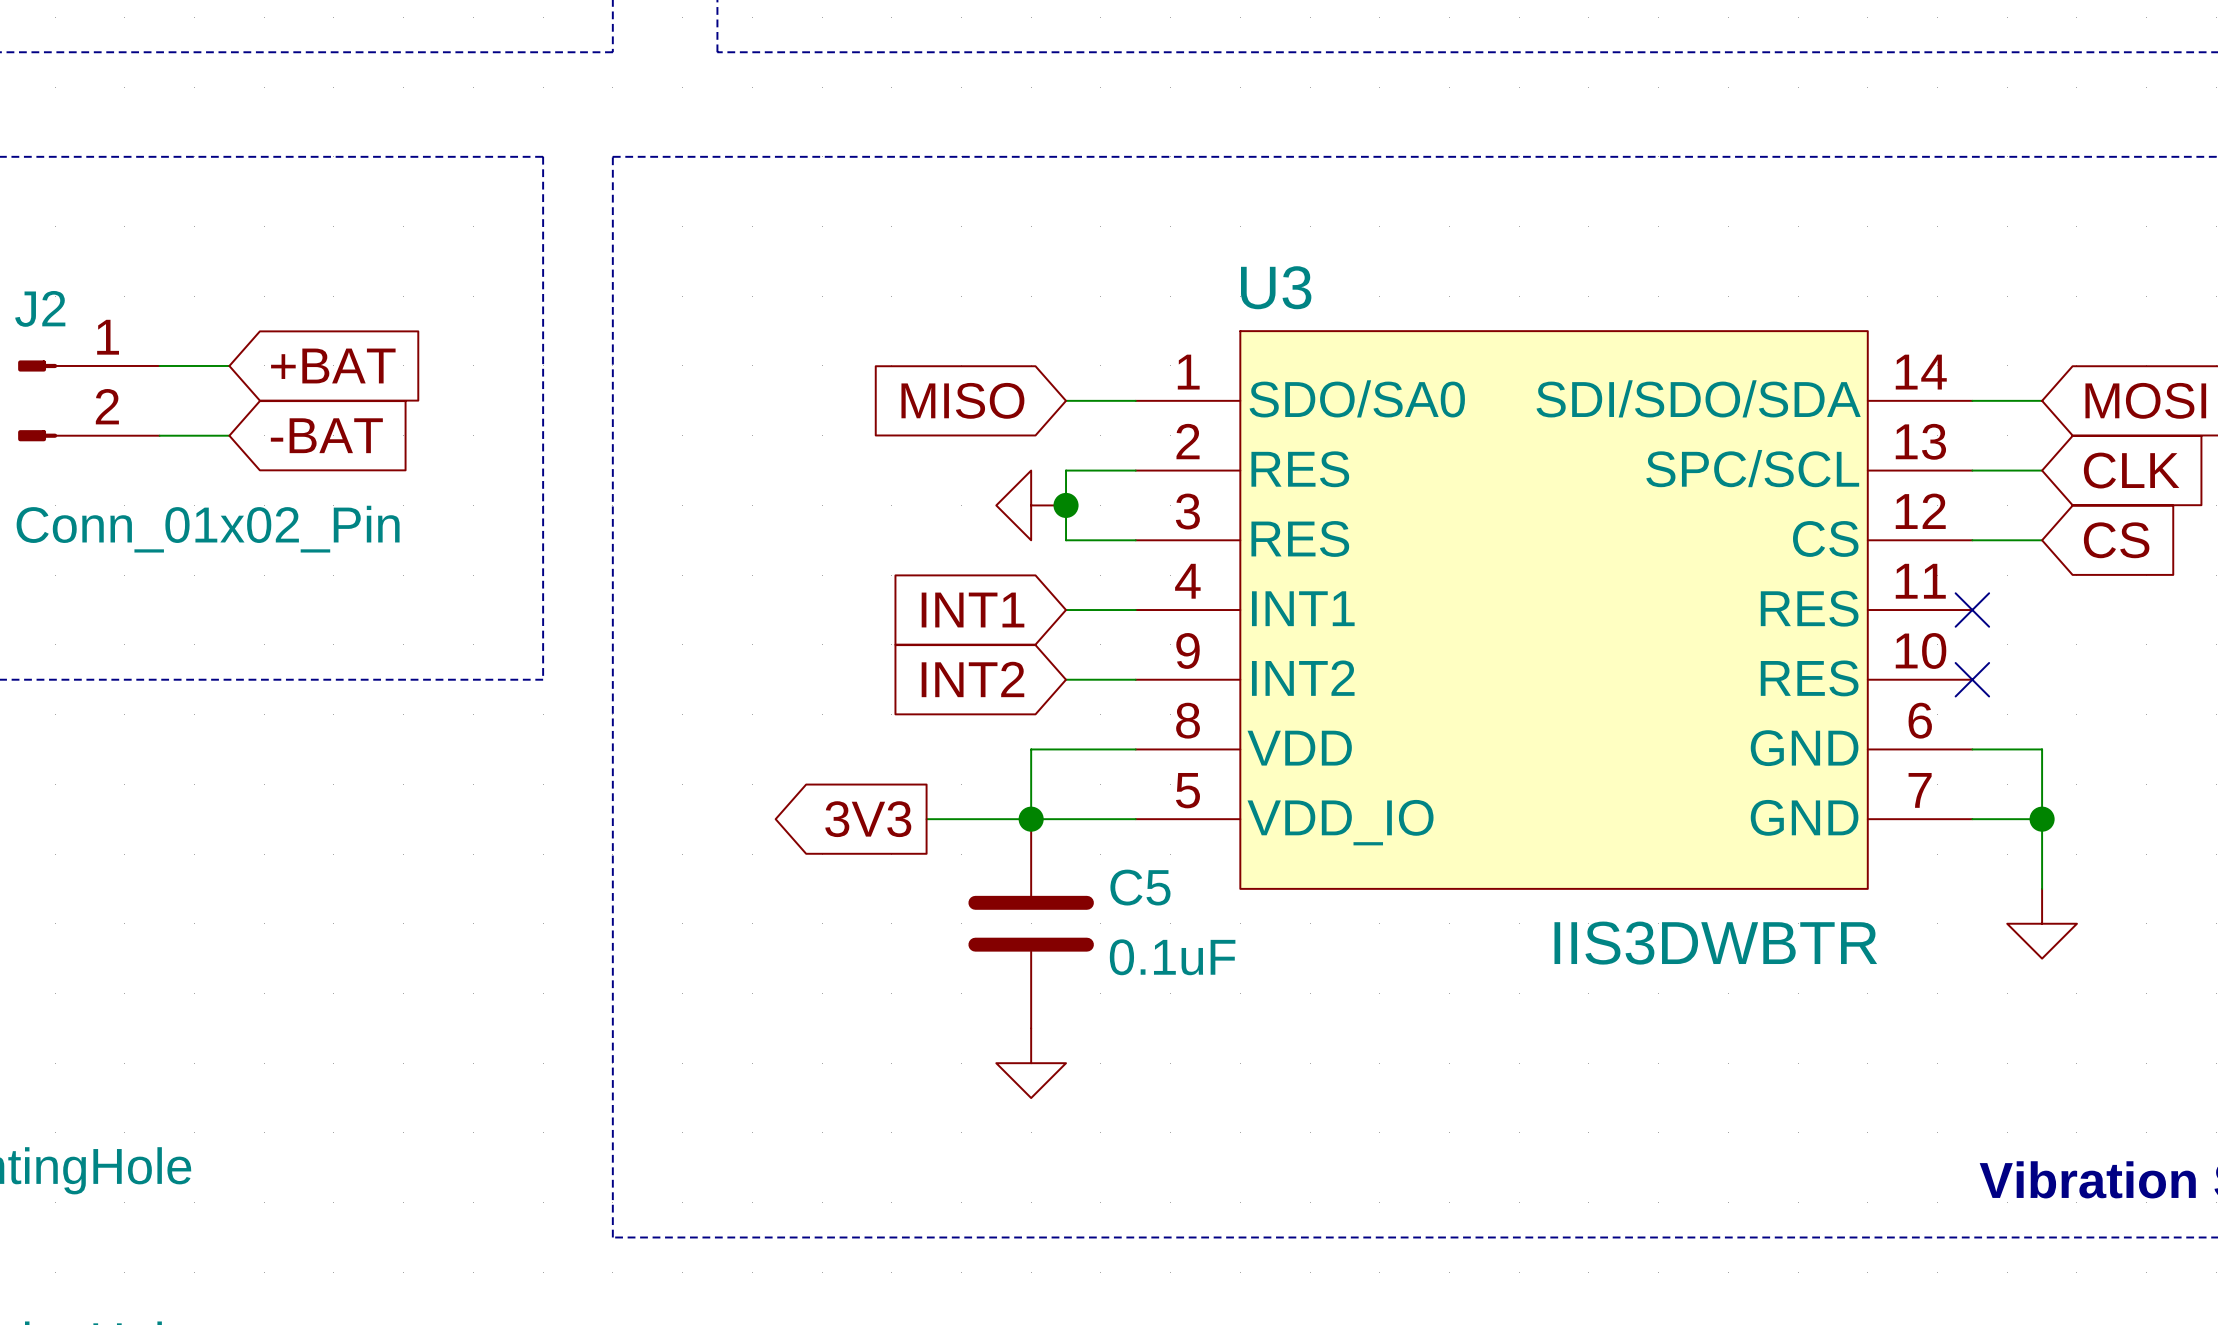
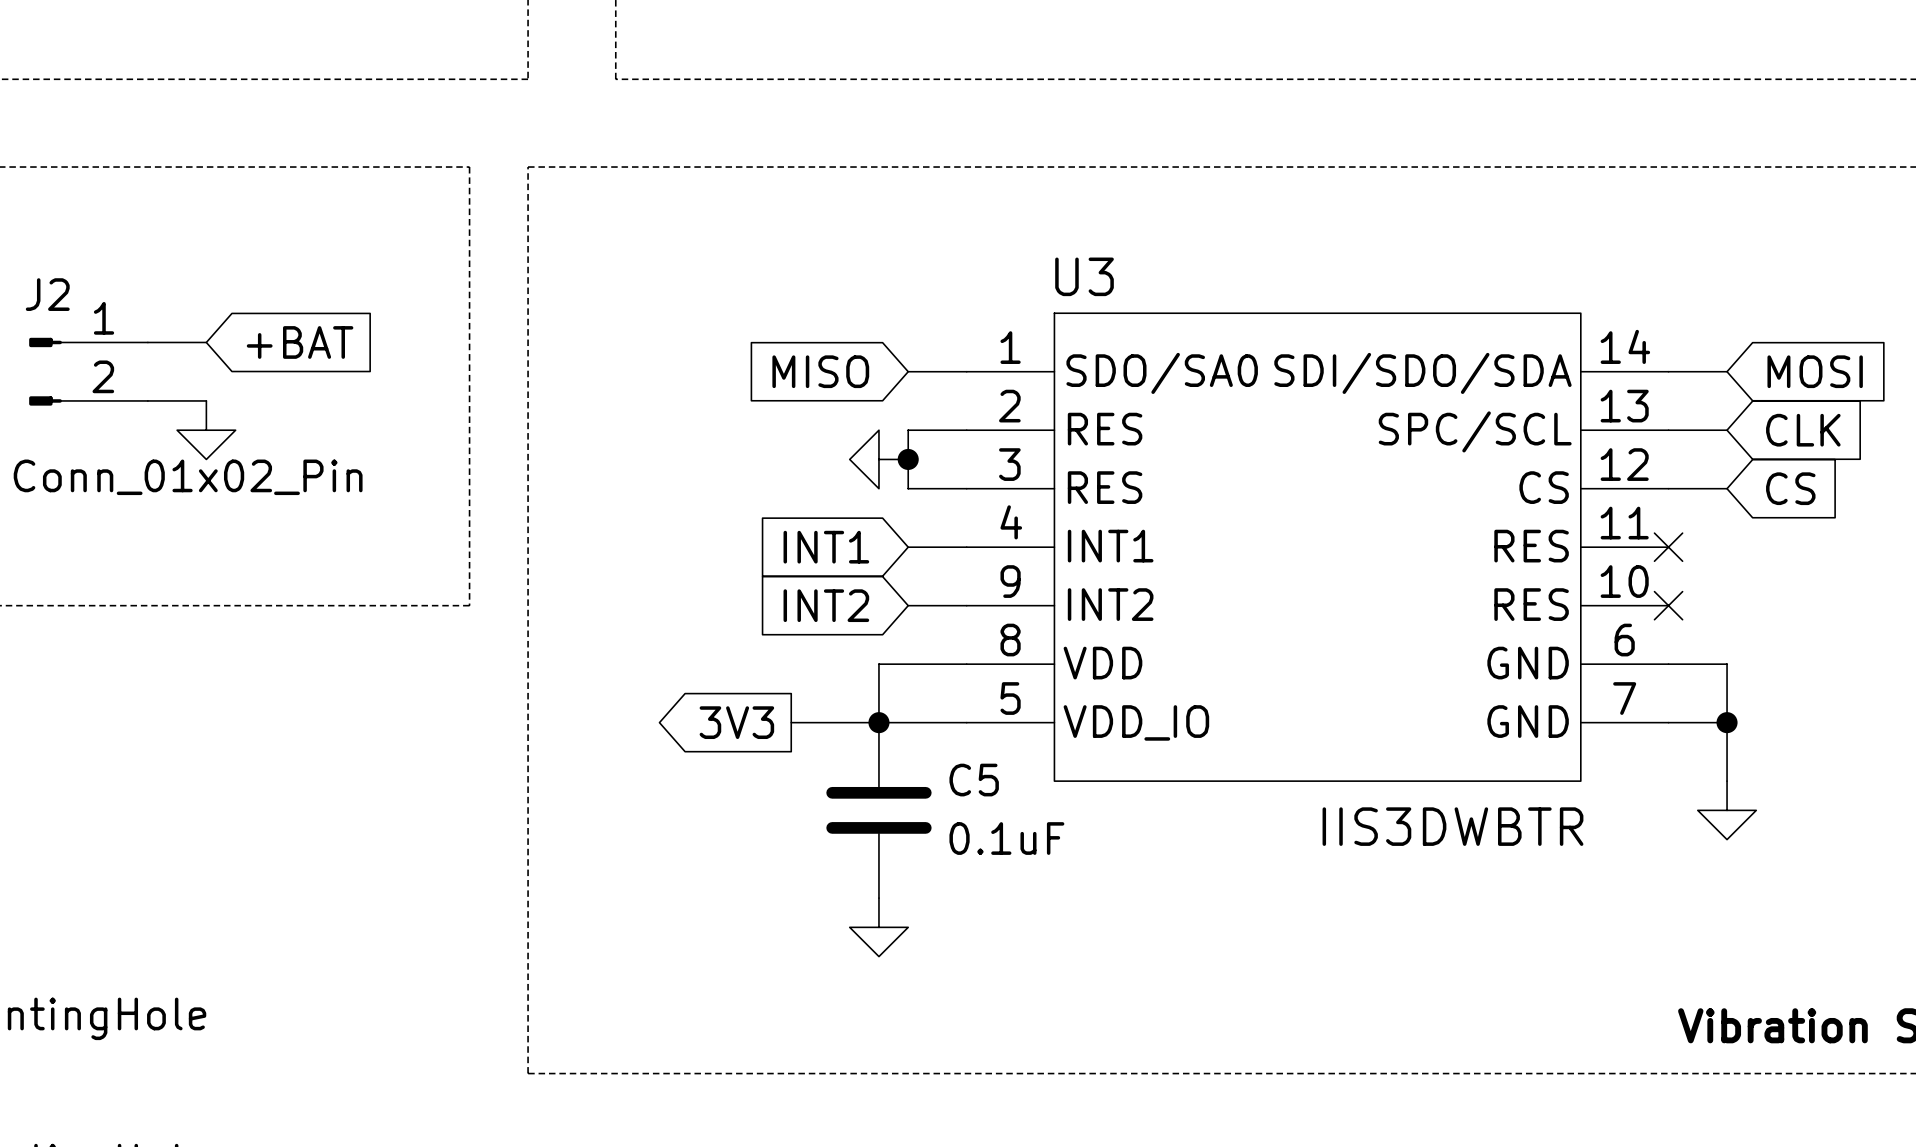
global label: -BAT (326, 435) -> none
power symbol: none -> (206, 430)

